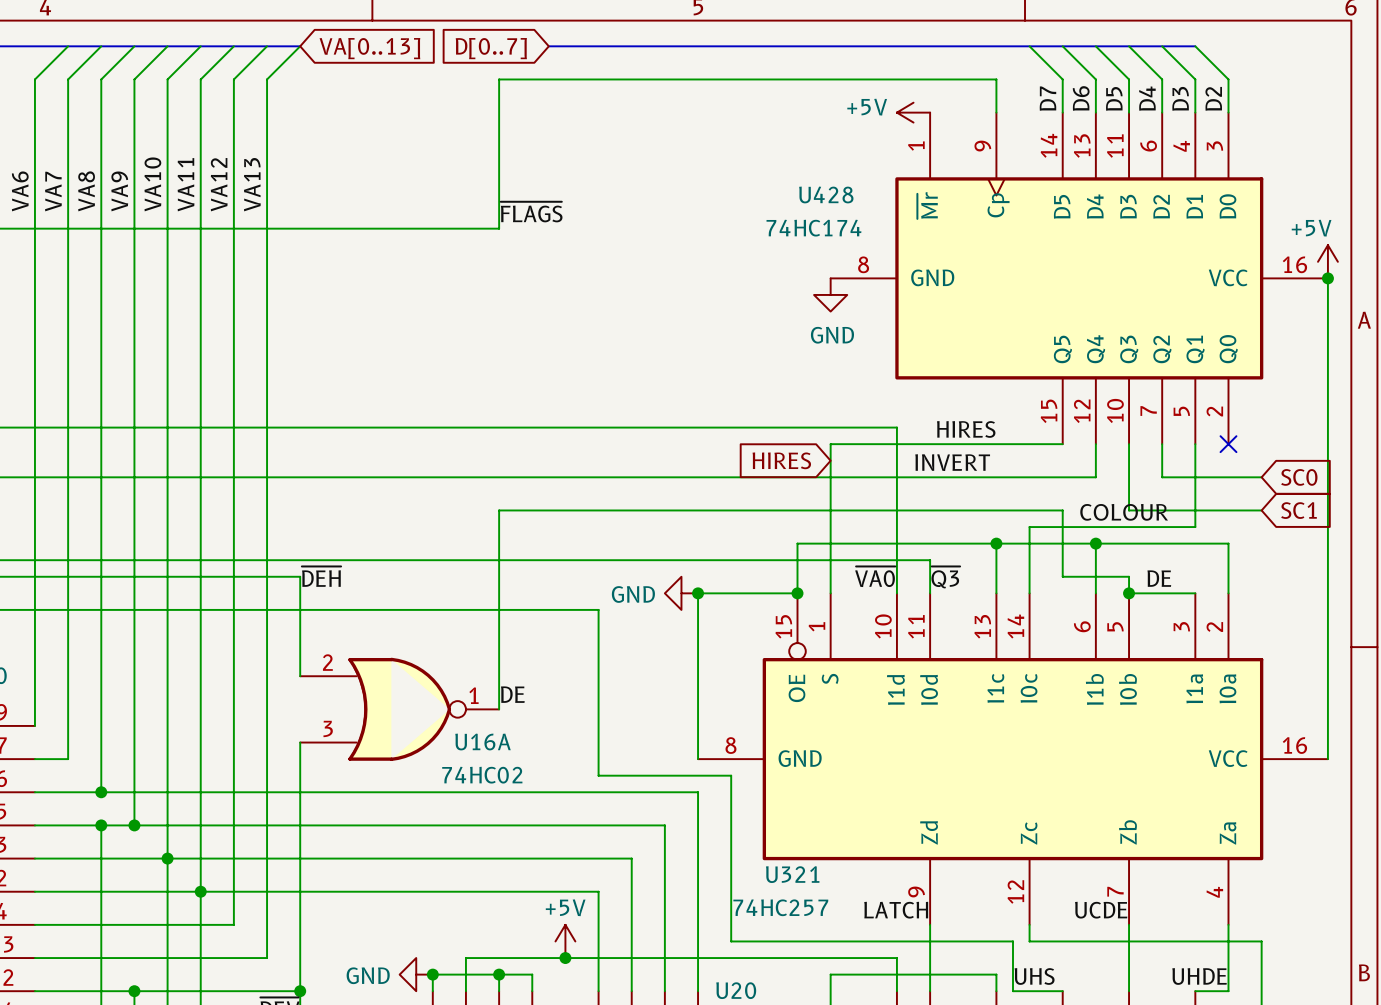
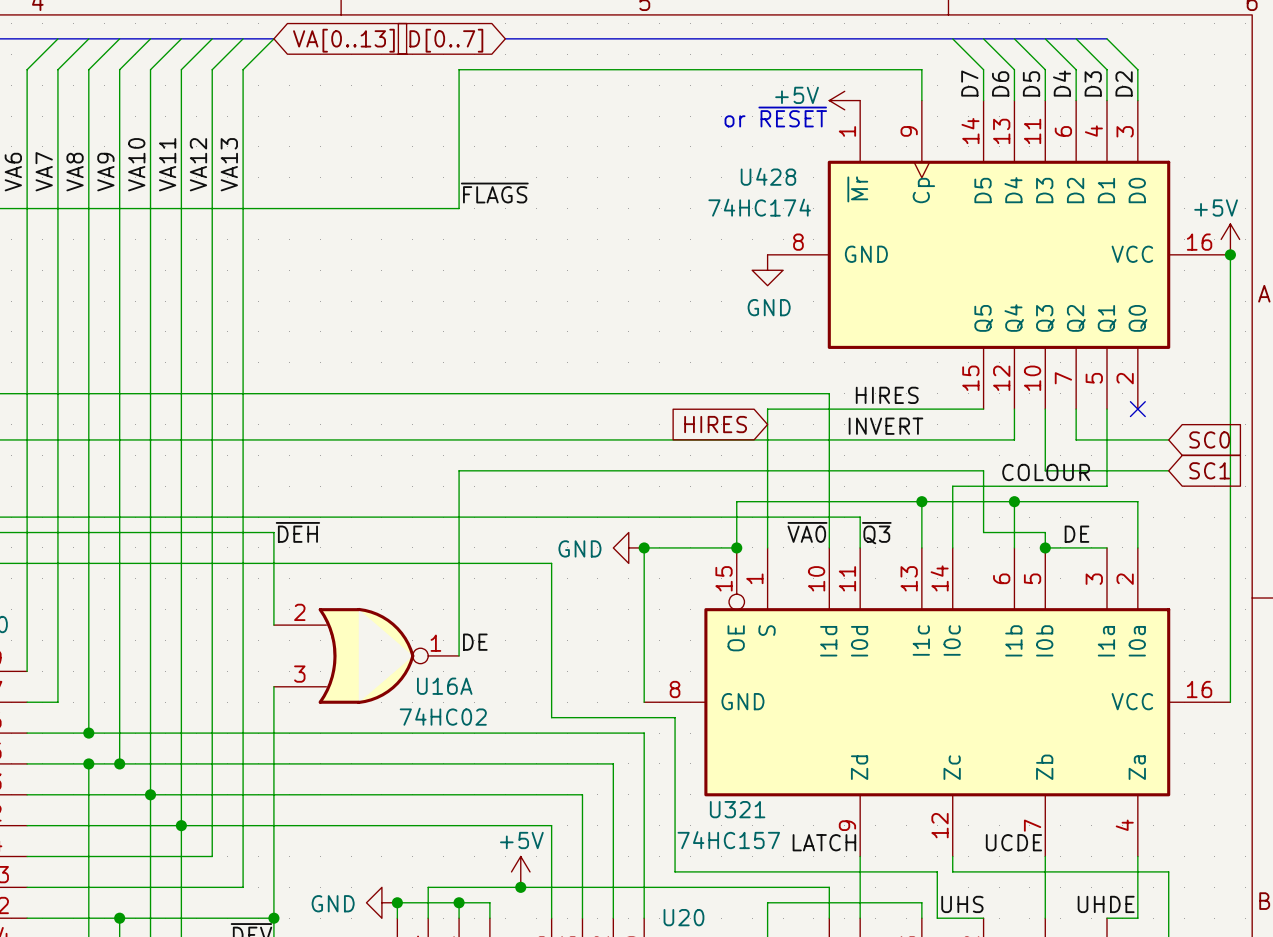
text: none -> or ~{RESET} (775, 117)
U321 value: 74HC257 (780, 907) -> 74HC157 (728, 840)

